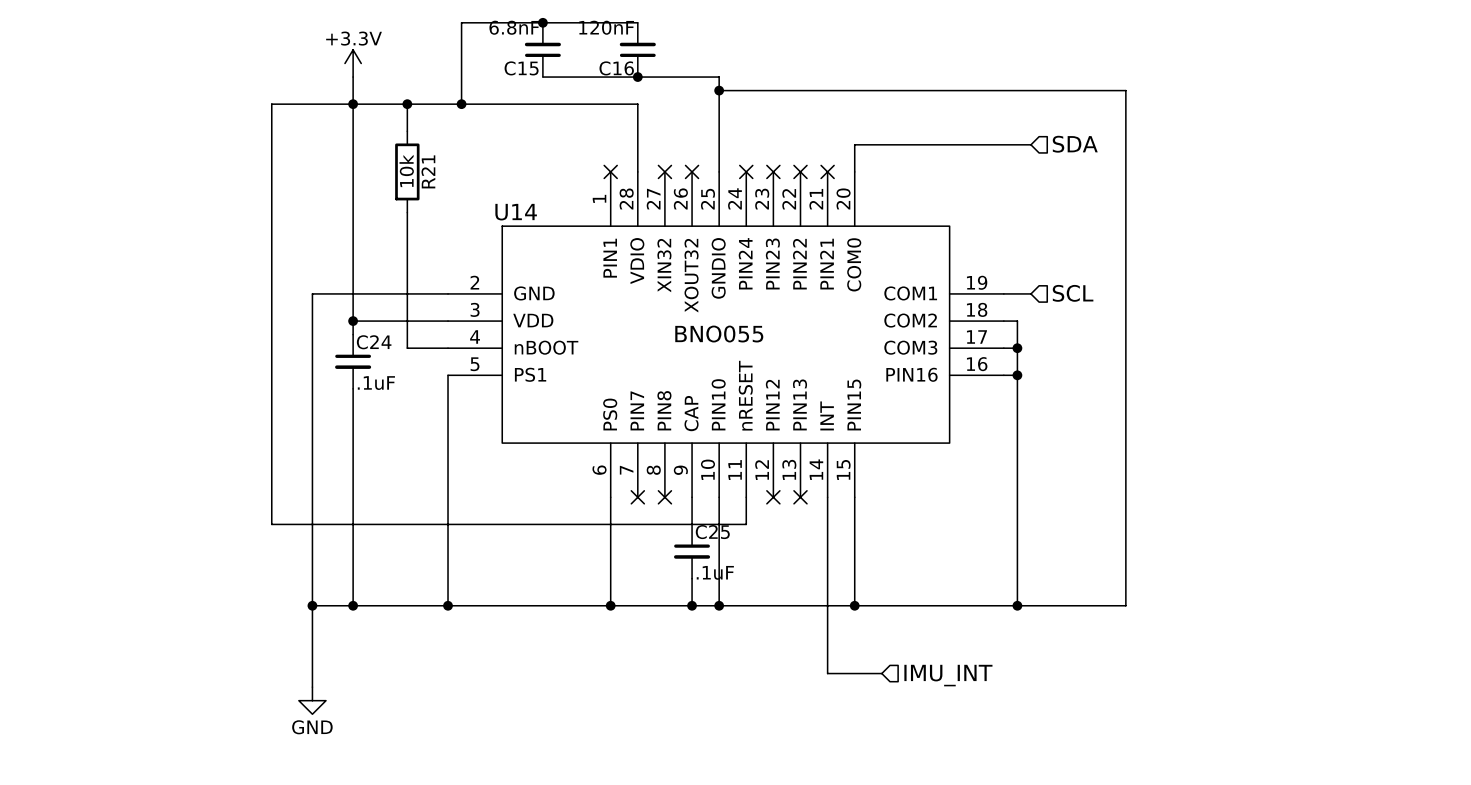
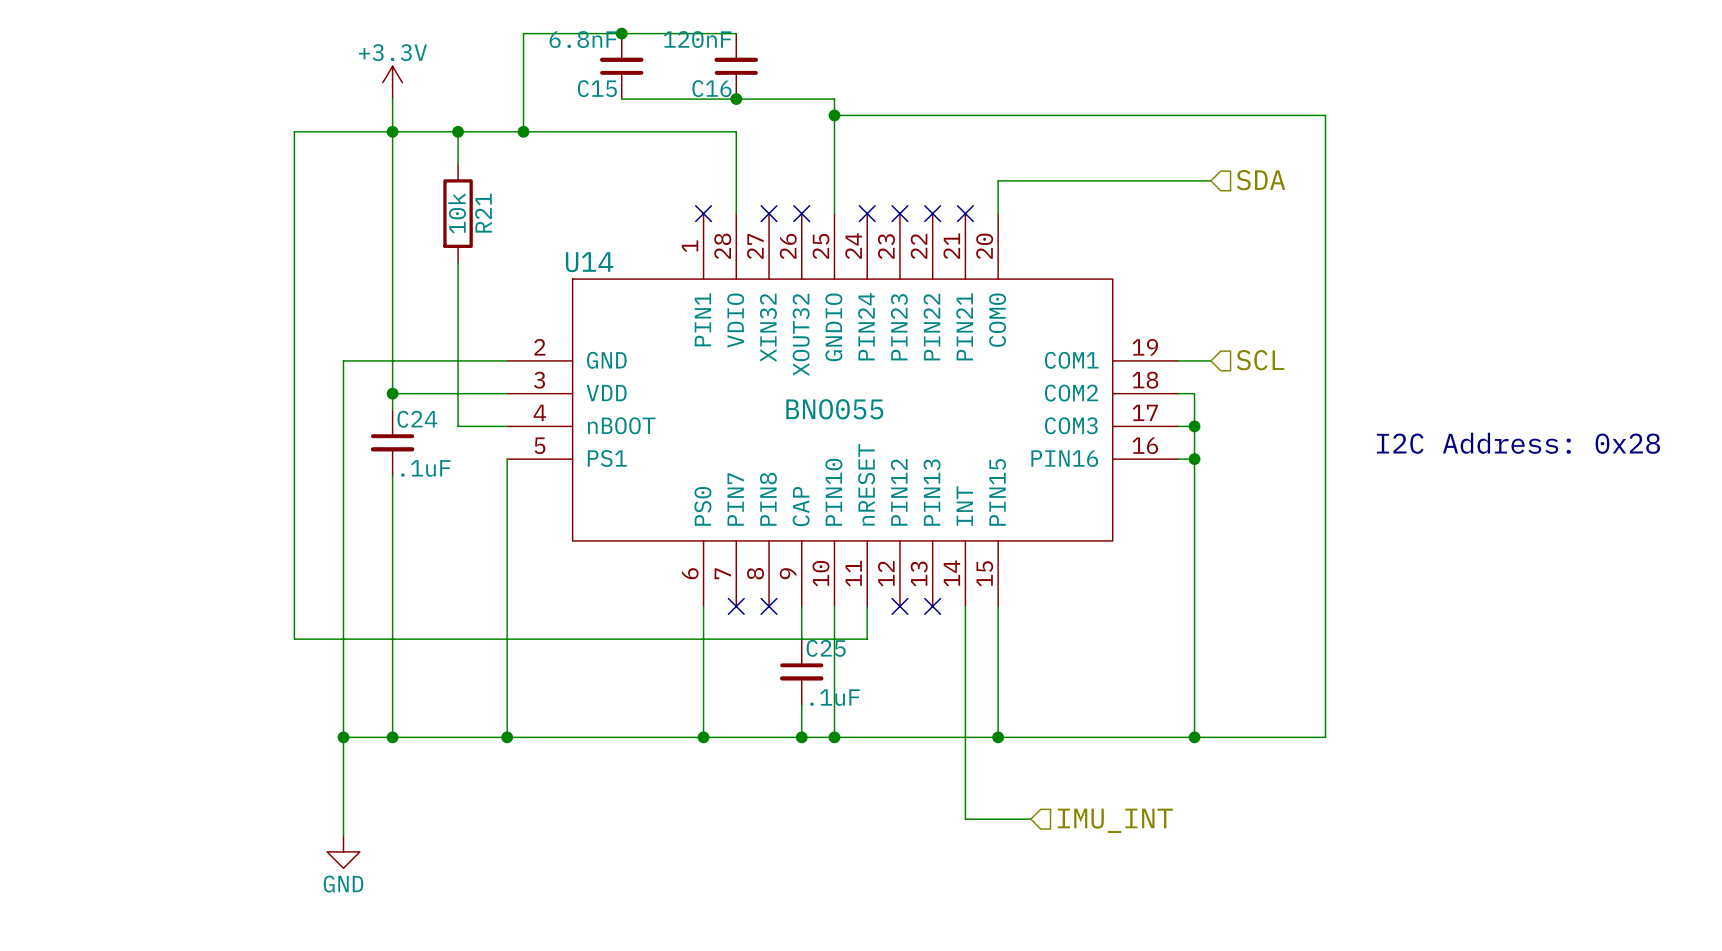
text: none -> I2C Address: 0x28 (1518, 443)

